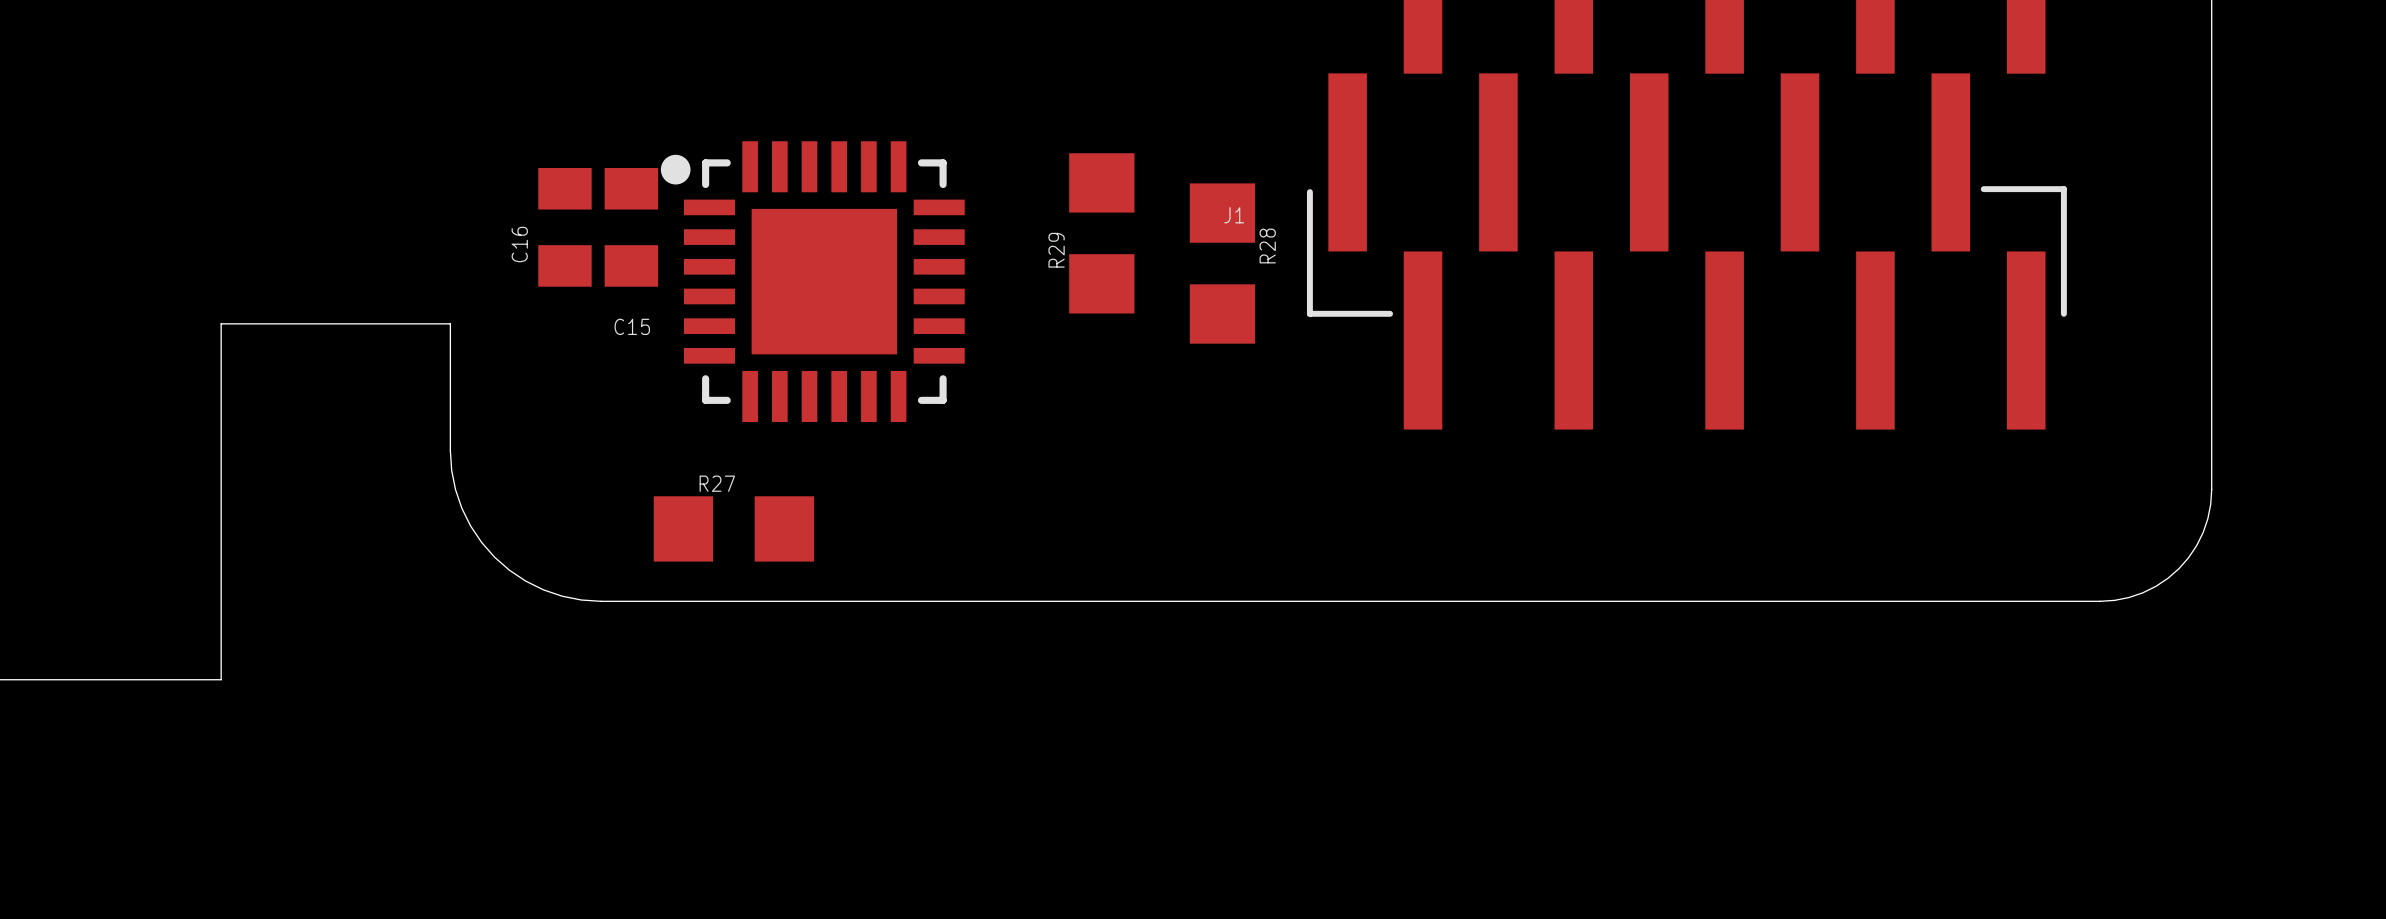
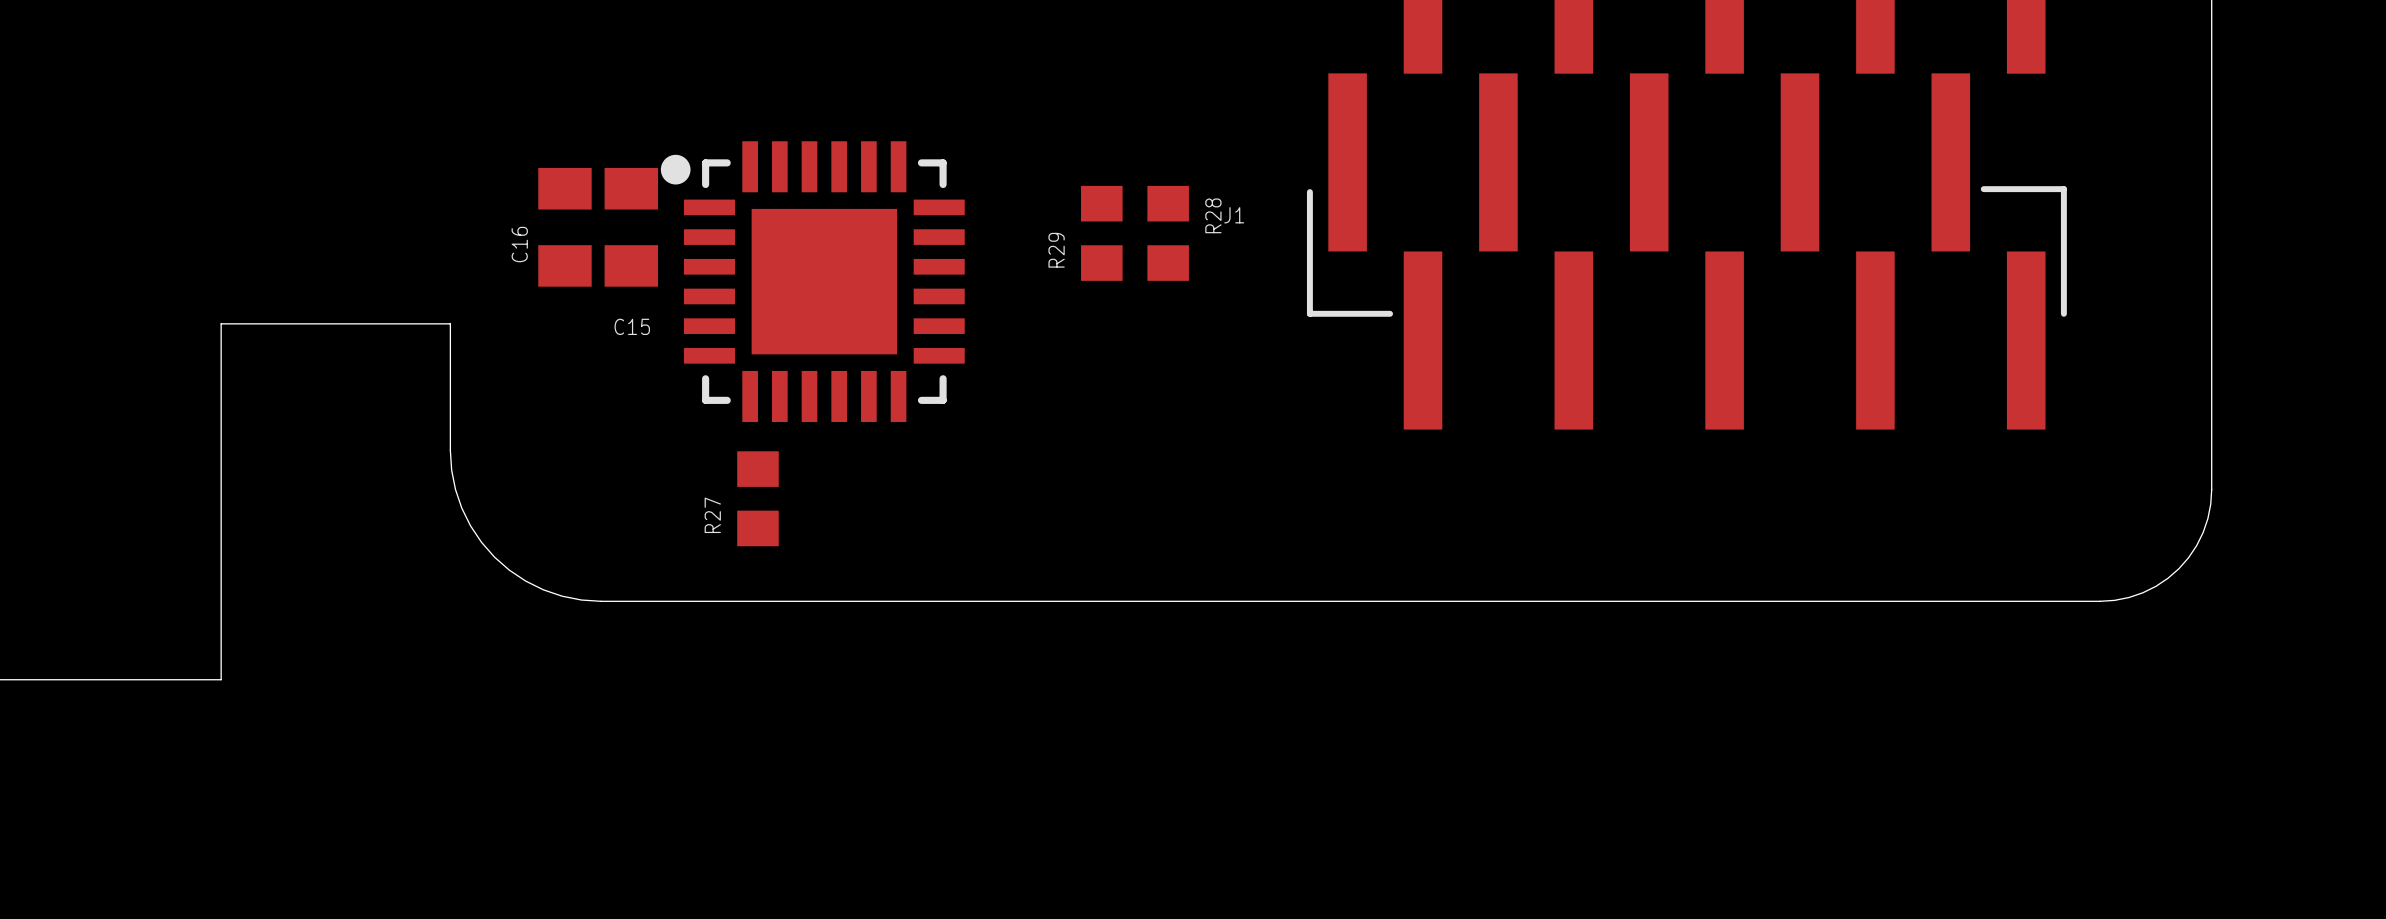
R29 footprint: [1069, 153, 1135, 314] -> [1081, 185, 1123, 281]
R28 footprint: [1189, 183, 1256, 344] -> [1147, 185, 1189, 281]
R27 footprint: [653, 496, 815, 562] -> [737, 451, 779, 547]

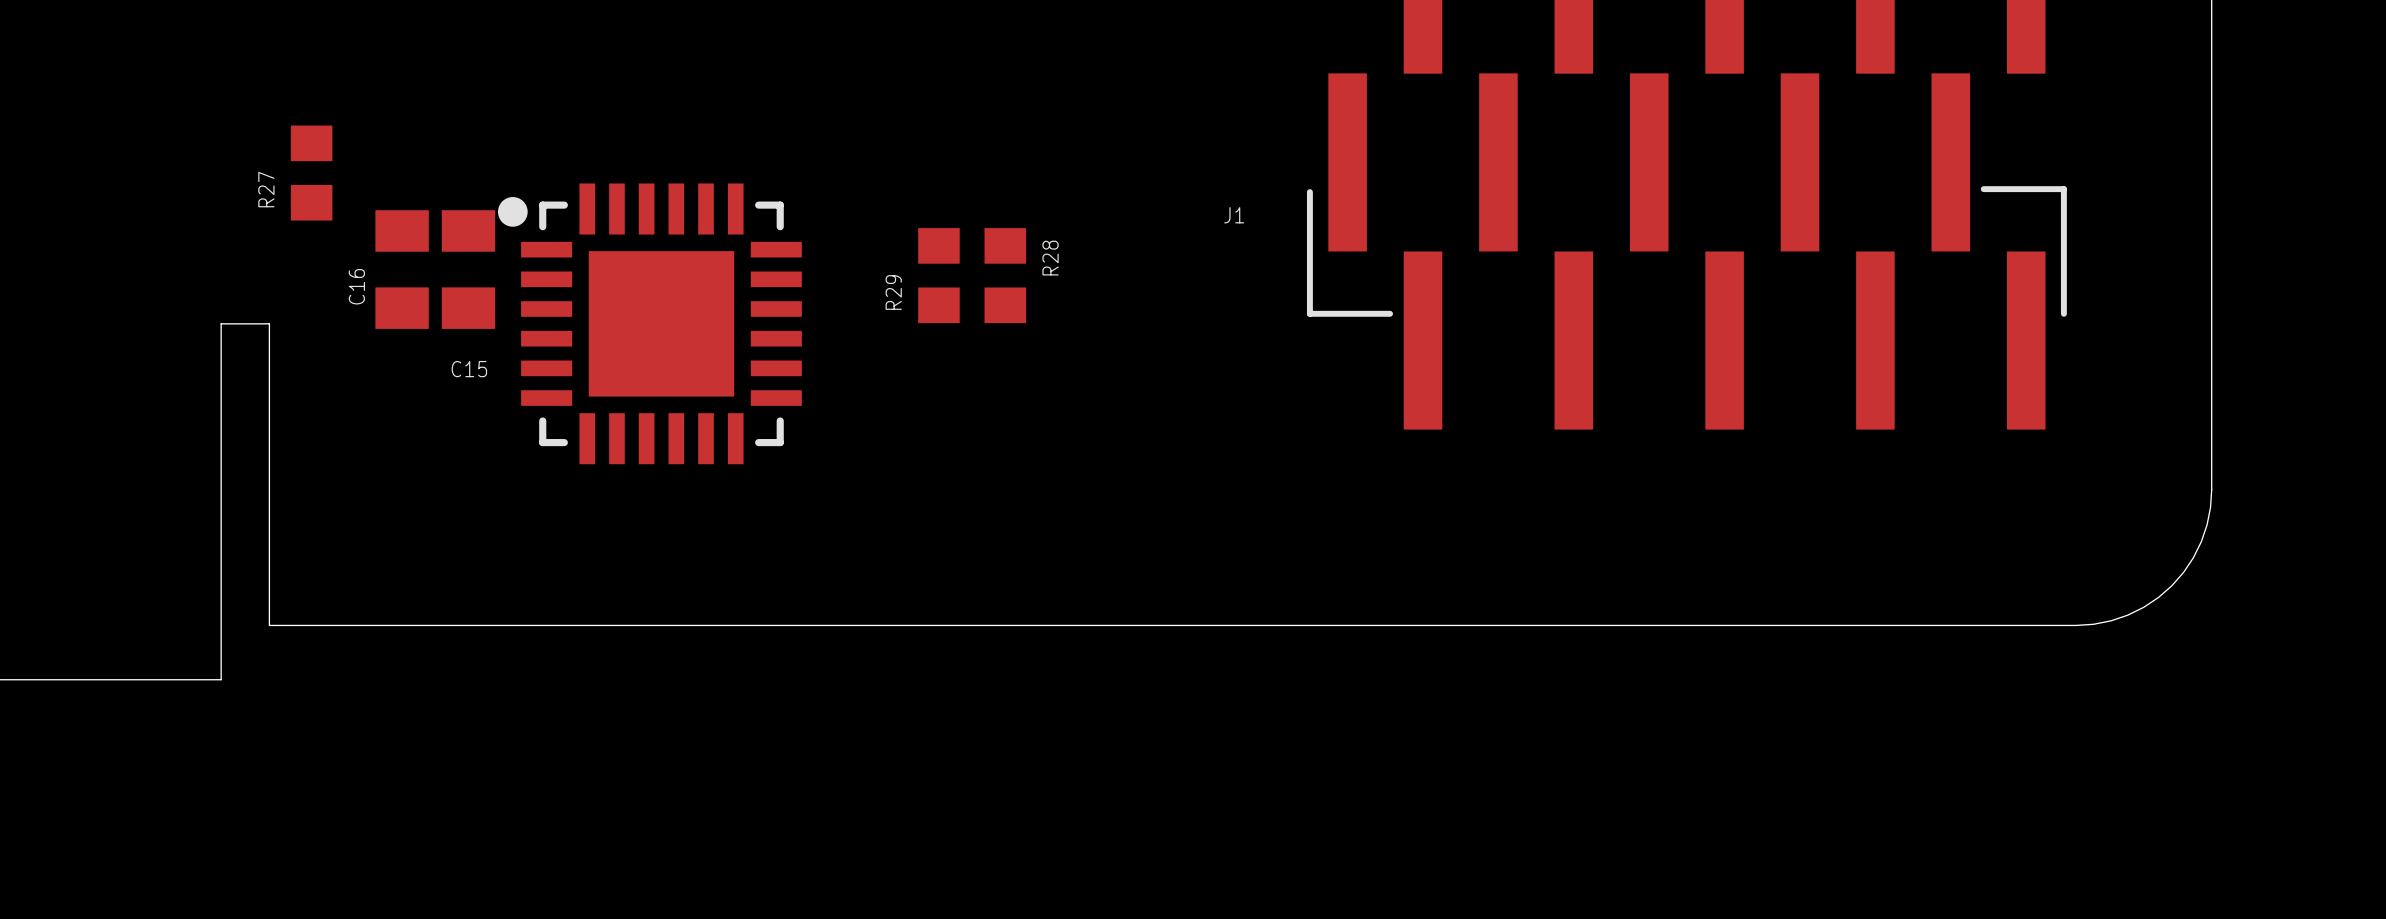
C16 position: (564, 227) -> (402, 269)
C15 position: (631, 227) -> (468, 269)
R29 position: (1101, 233) -> (938, 275)
R28 position: (1168, 233) -> (1005, 275)
part position: (812, 281) -> (649, 323)
board edge: (269, 323) (450, 323) (450, 450) (455, 489) (461, 508) (481, 542) (509, 570) (543, 589) (581, 600) (2114, 600) (2128, 597) (2155, 586) (2179, 568) (2196, 545) (2203, 532) (2207, 518) (2211, 489) -> (269, 323) (269, 625) (2093, 624) (2111, 620) (2143, 607) (2158, 597) (2183, 572) (2201, 541) (2207, 524) (2211, 489)
R27 position: (757, 498) -> (311, 173)

